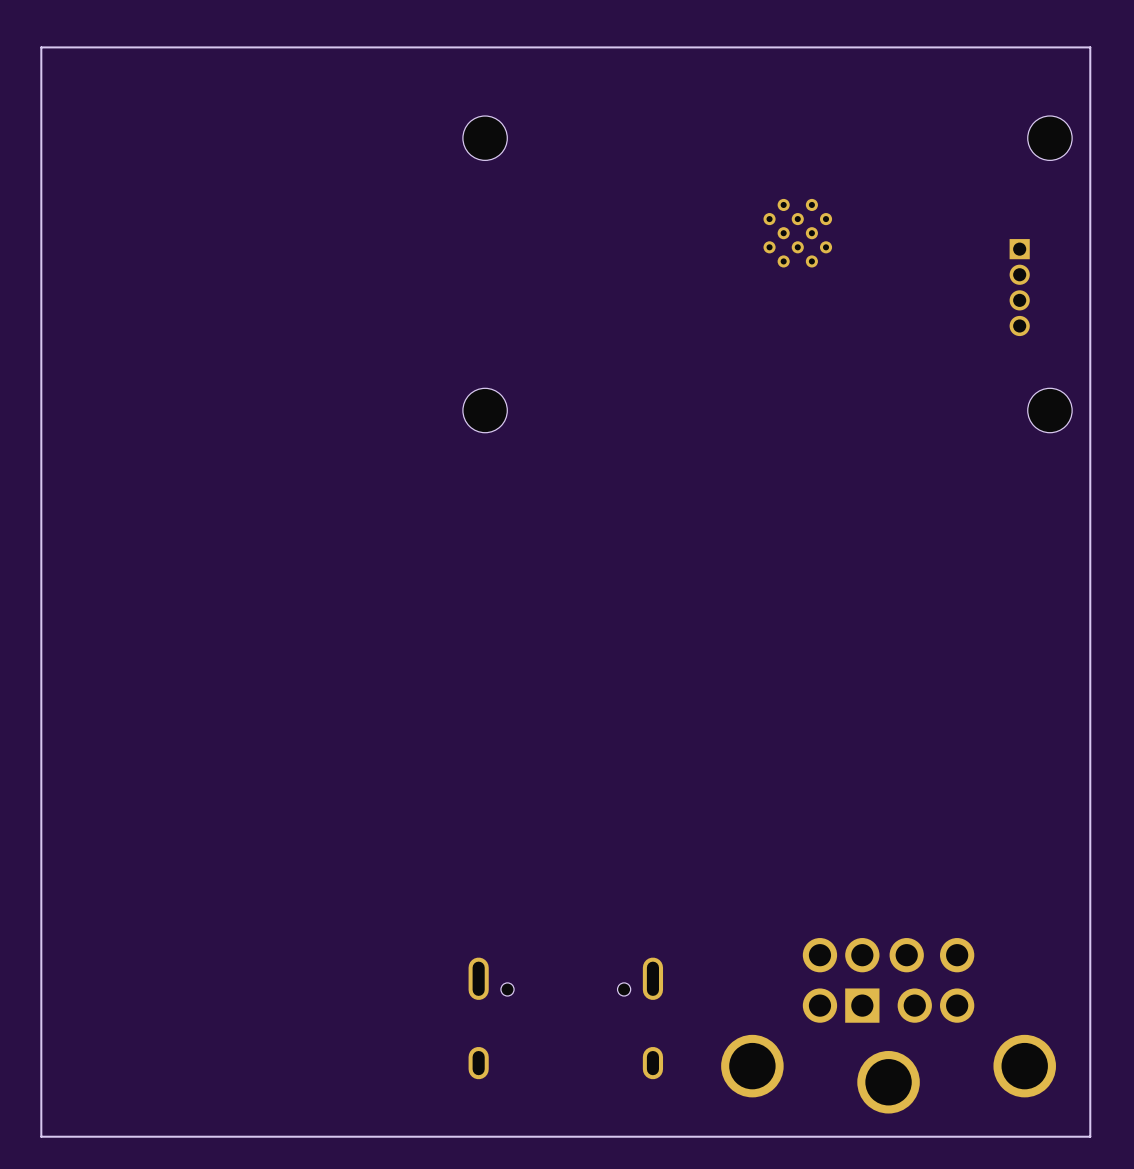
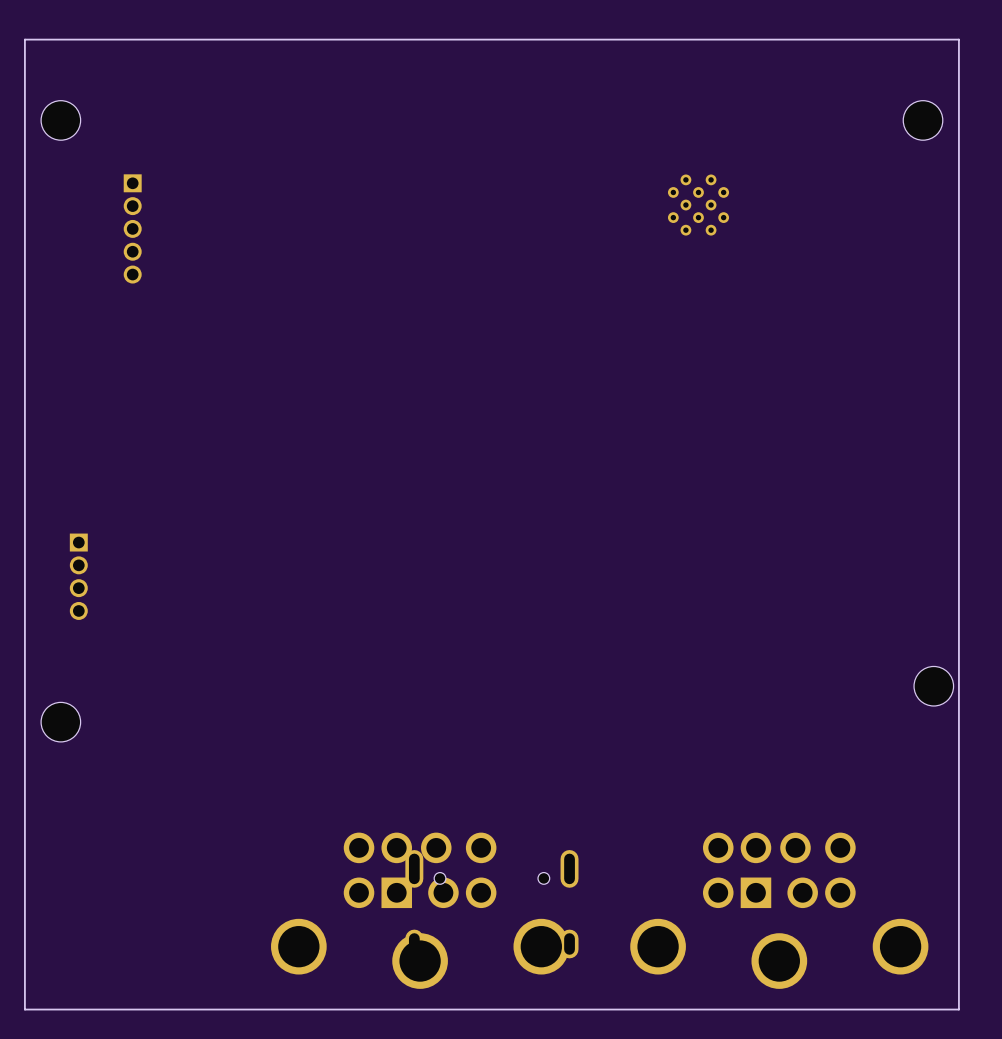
part: none -> (60, 120)
part: (485, 138) -> none
part: none -> (132, 228)
part: (1019, 287) -> none
part: (485, 410) -> none
part: (1049, 410) -> none
part: none -> (78, 576)
part: none -> (933, 686)
part: none -> (60, 722)
part: none -> (420, 910)

